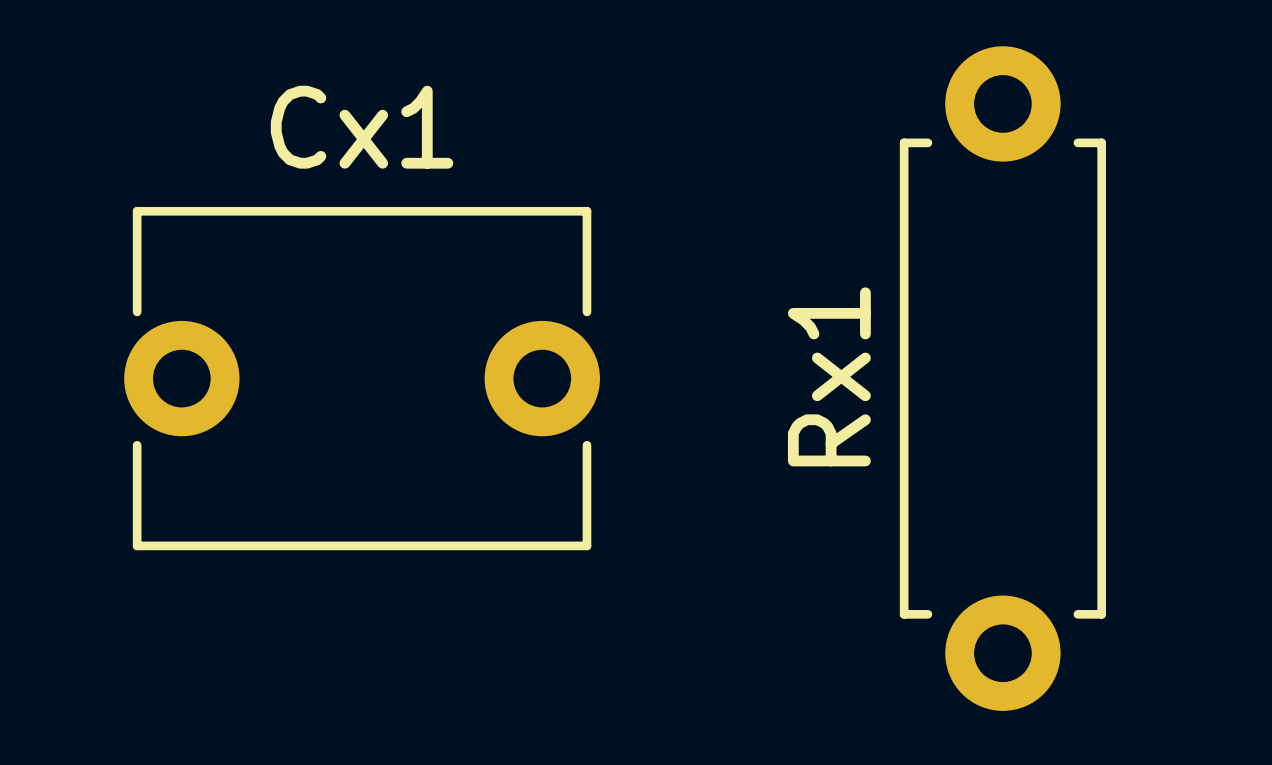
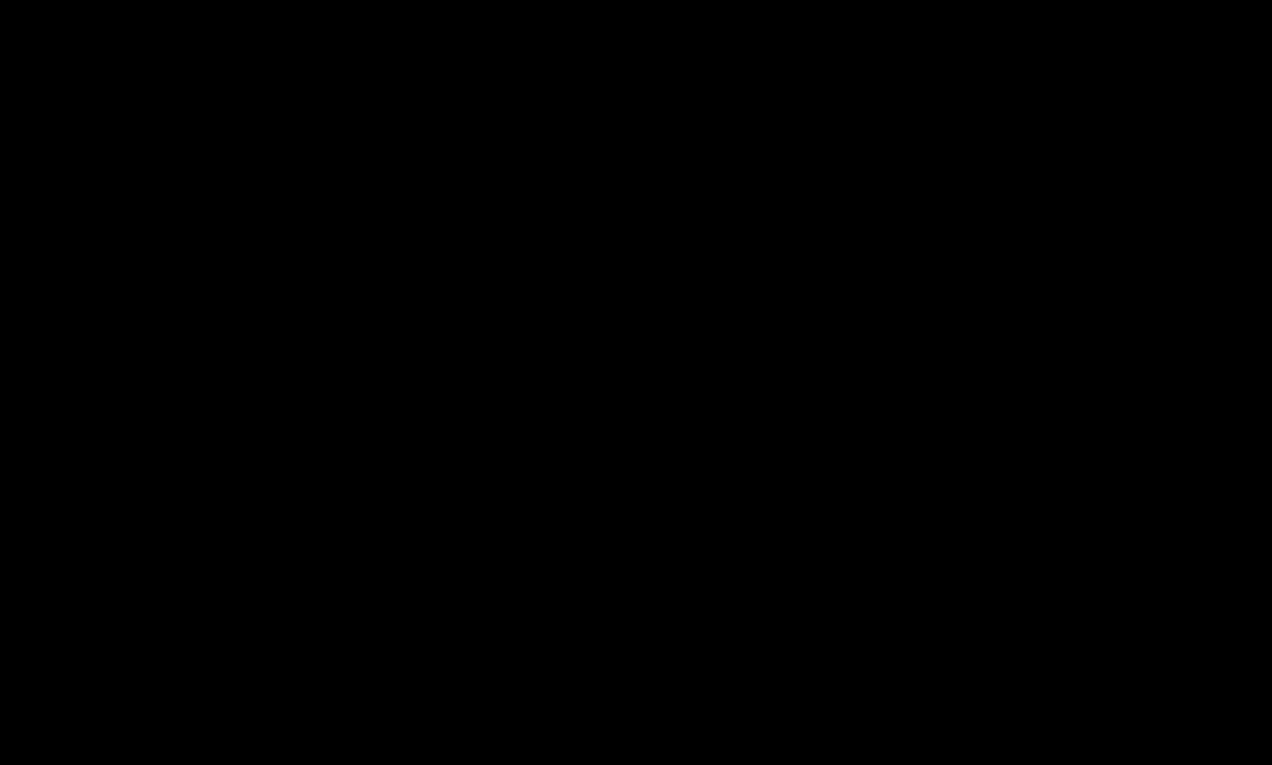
Cx1: (362, 378) -> none
Rx1: (1002, 378) -> none

